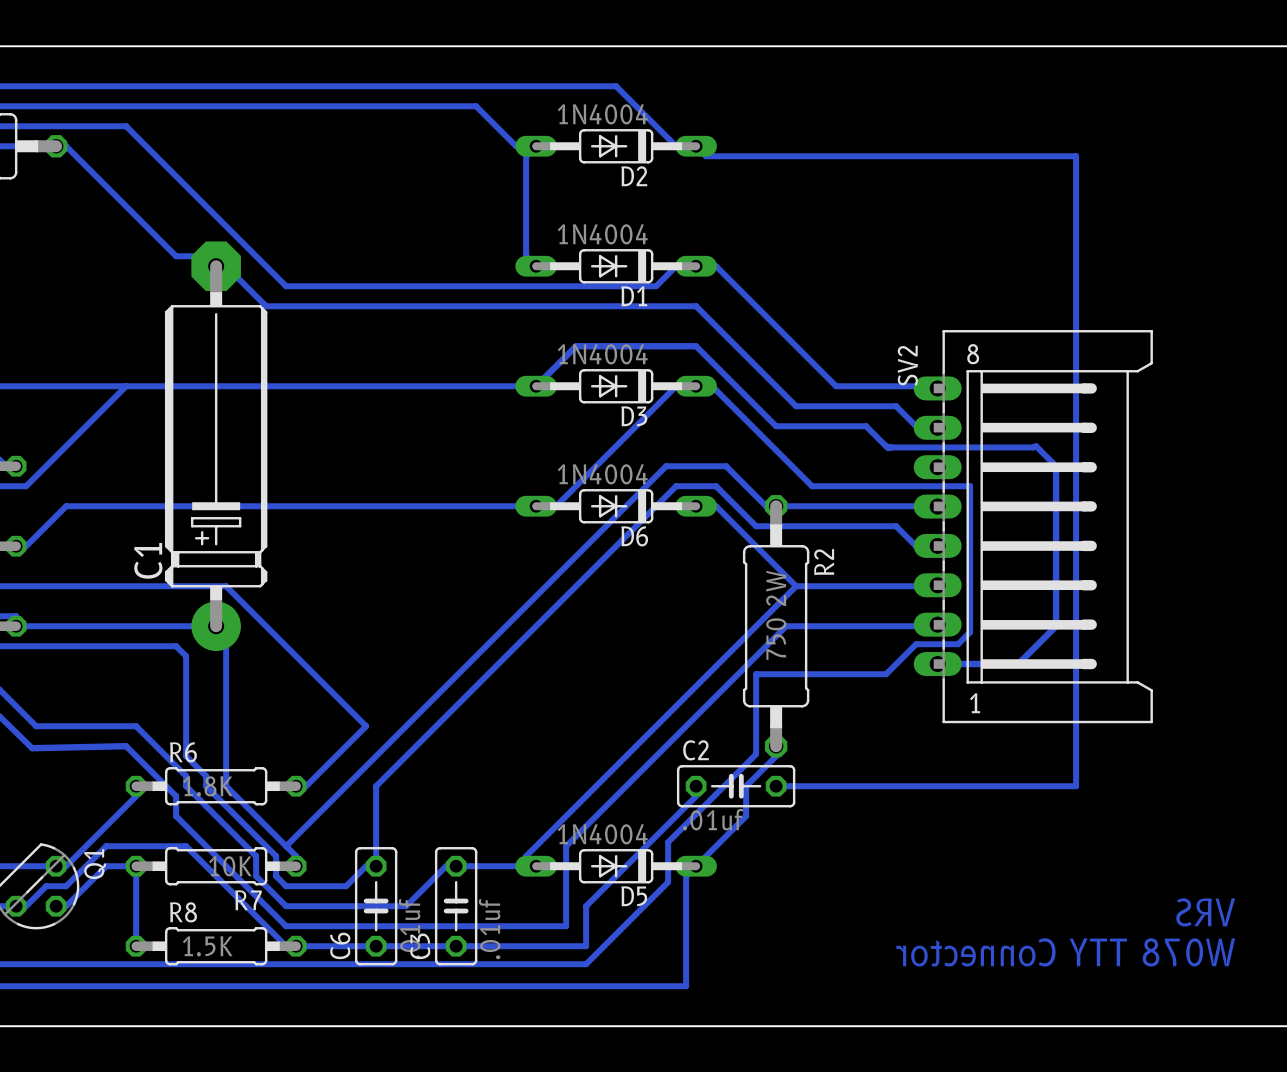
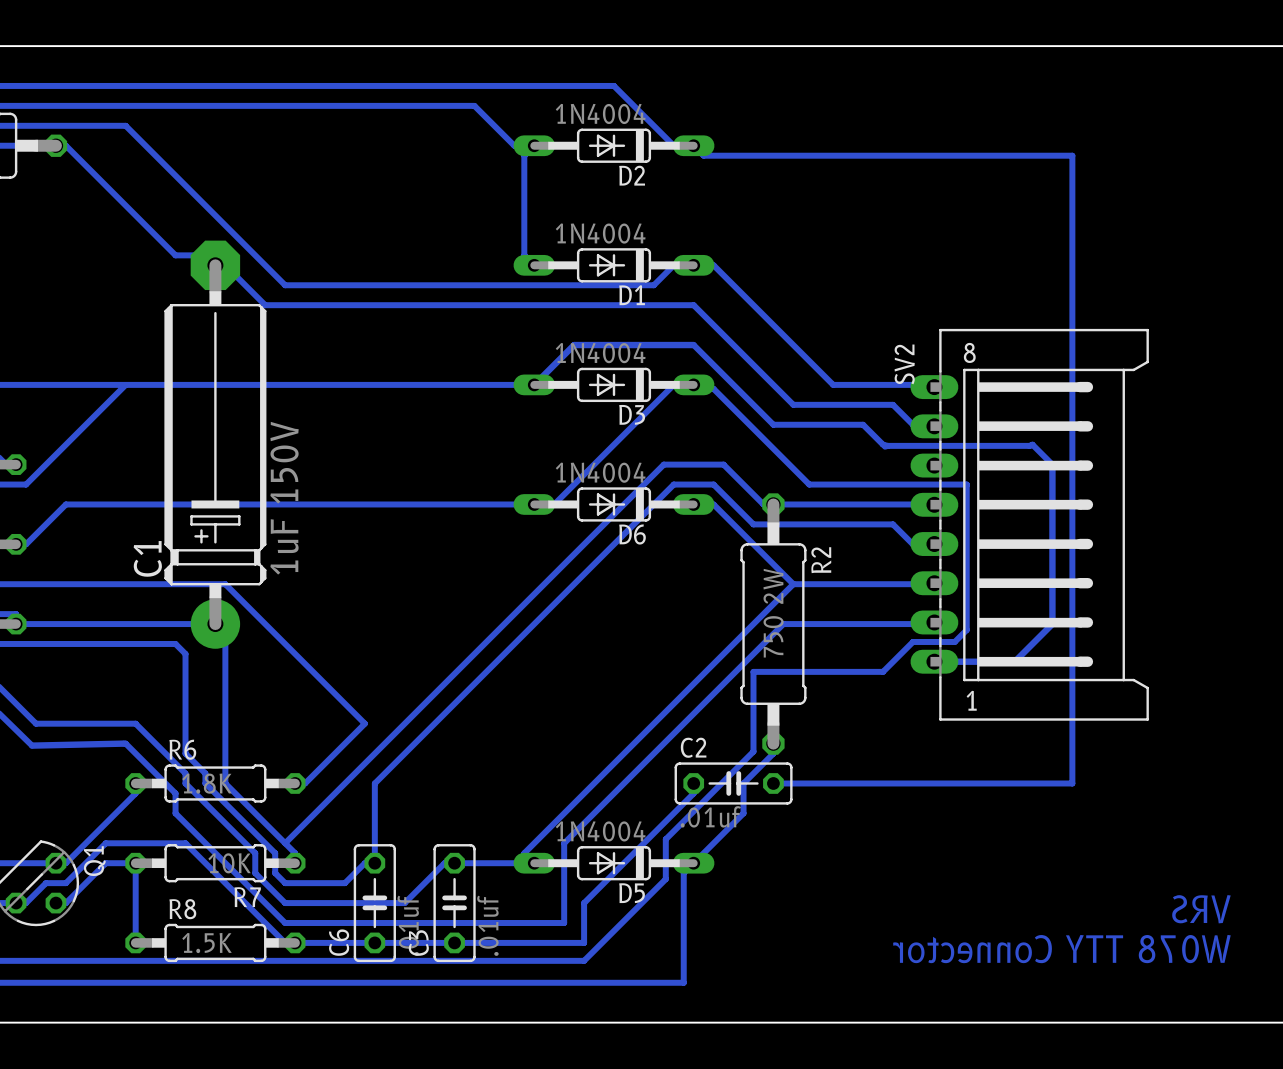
C1 value: none -> 1uF 150V (284, 498)

